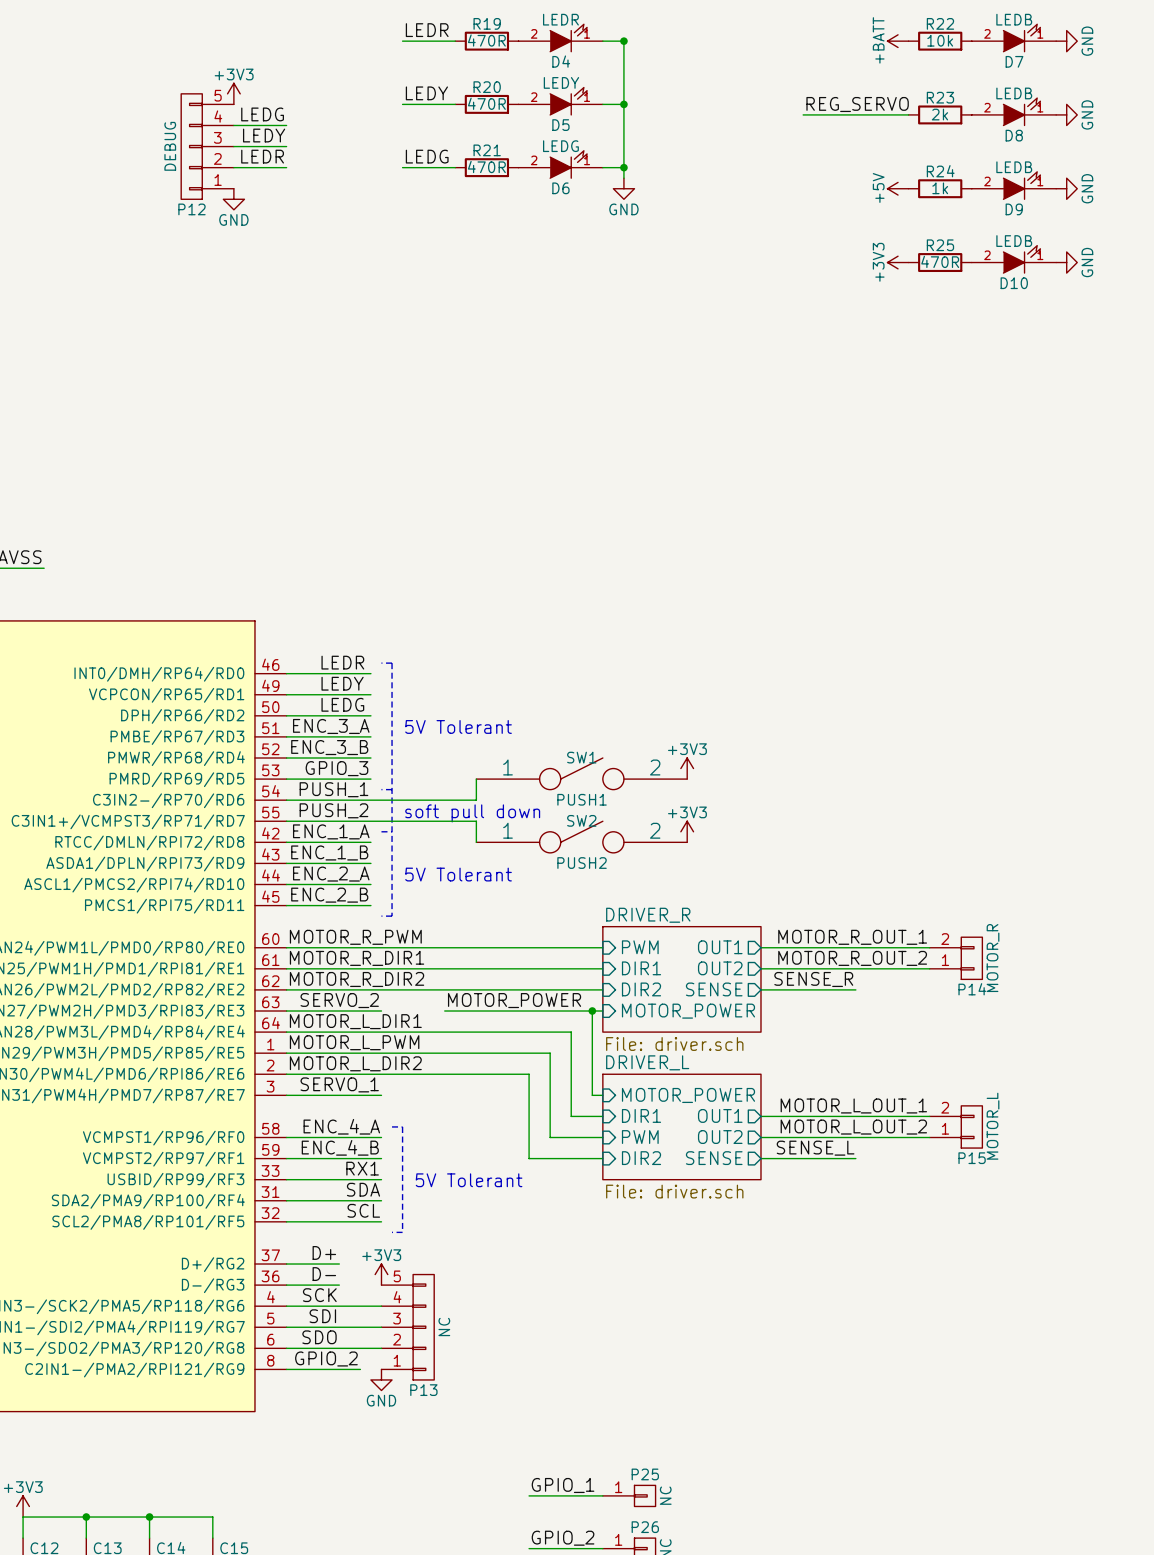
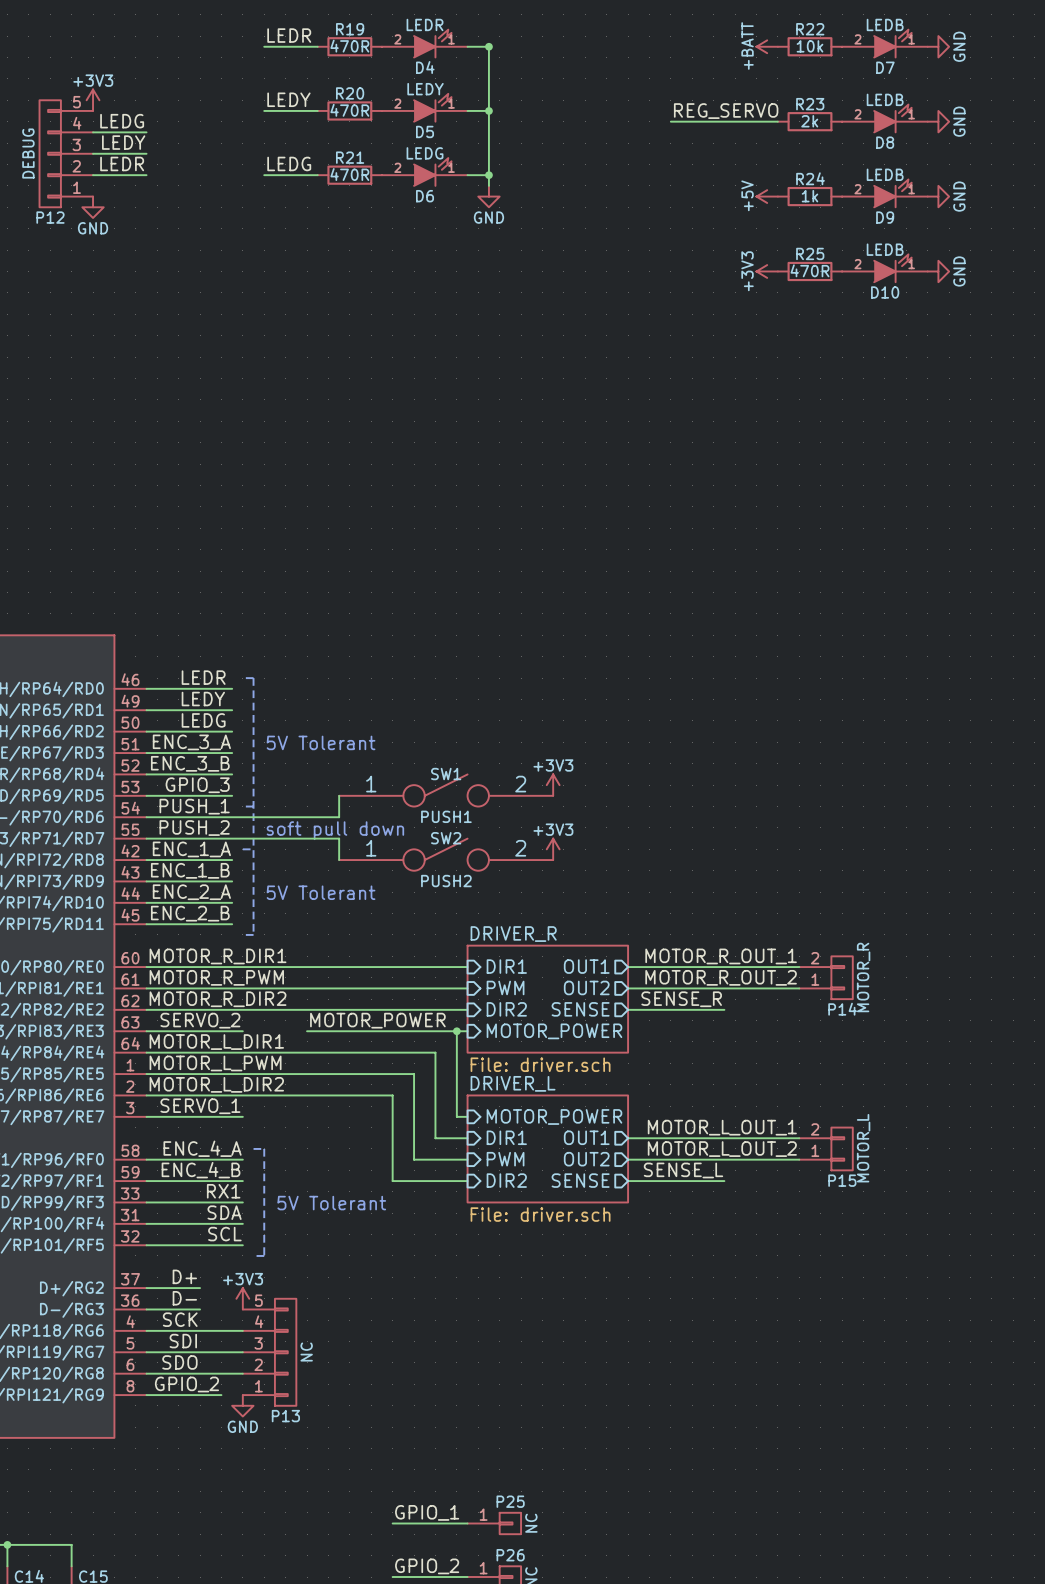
label: MOTOR_R_PWM (355, 937) -> MOTOR_R_DIR1 (218, 956)
sheet pin: PWM (640, 947) -> DIR1 (506, 966)
label: MOTOR_R_DIR1 (357, 958) -> MOTOR_R_PWM (216, 977)
sheet pin: DIR1 (641, 968) -> PWM (505, 987)

